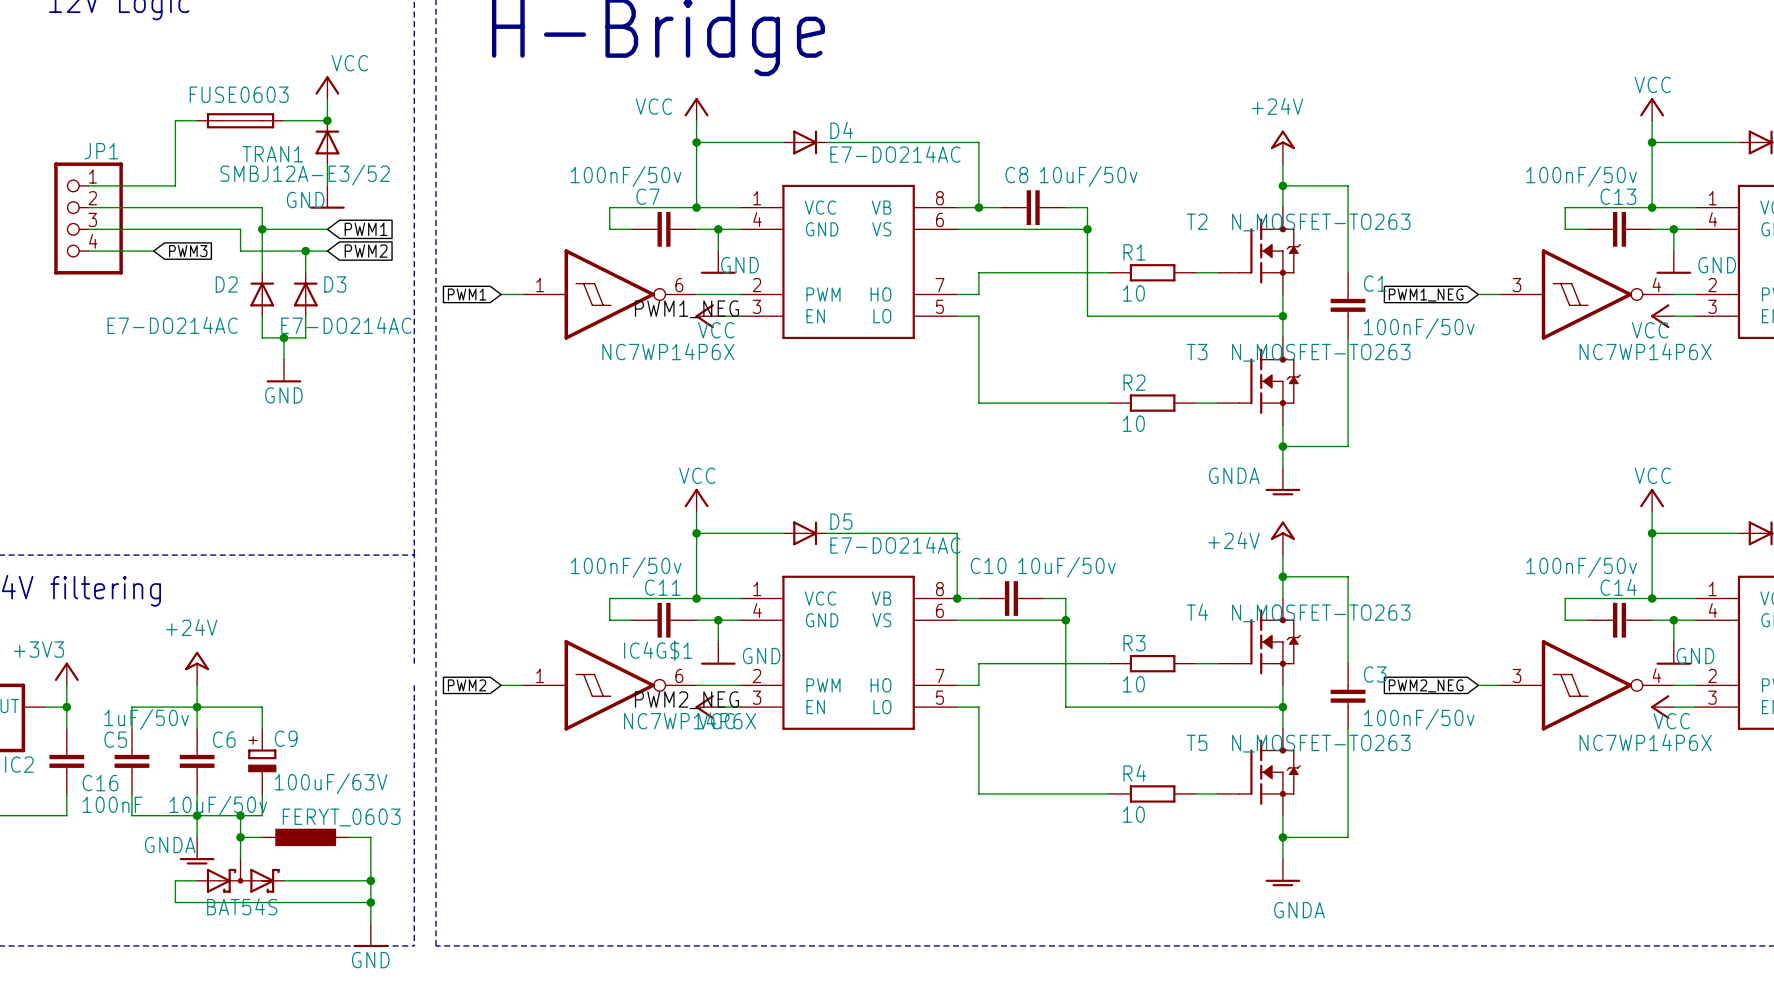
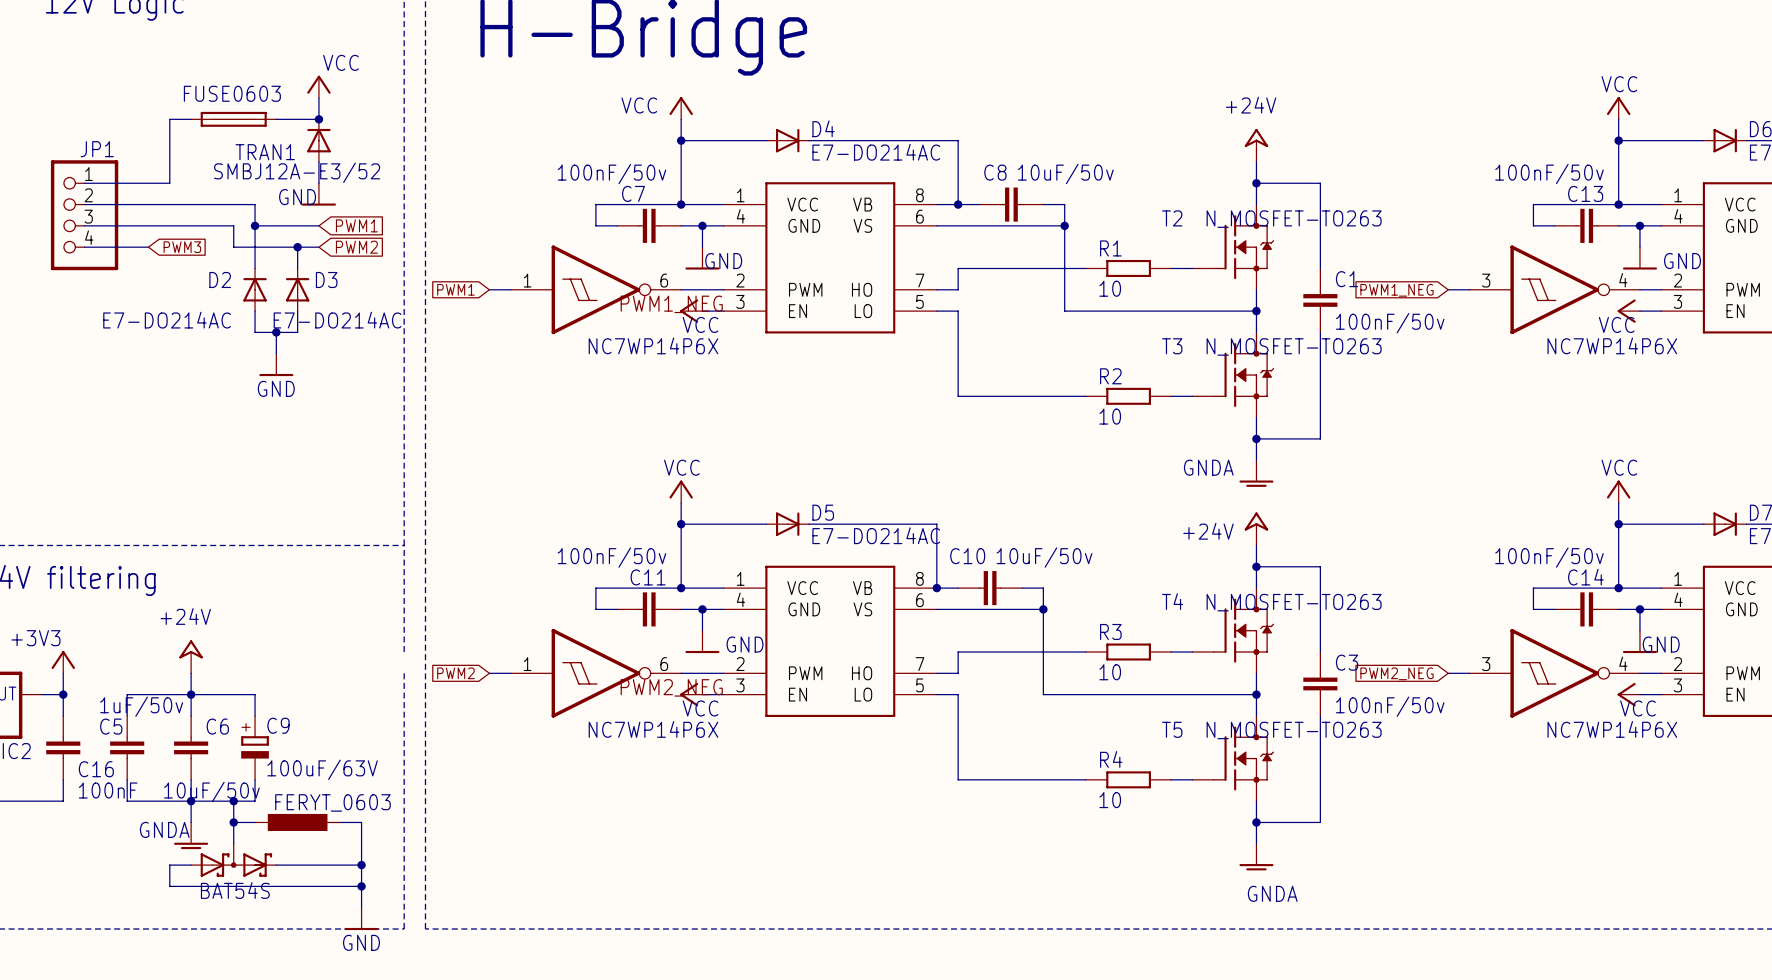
IC4G$1 name: IC4G$1 (658, 650) -> none
IC4G$1 value position: NC7WP14P6X (690, 720) -> NC7WP14P6X (653, 729)

